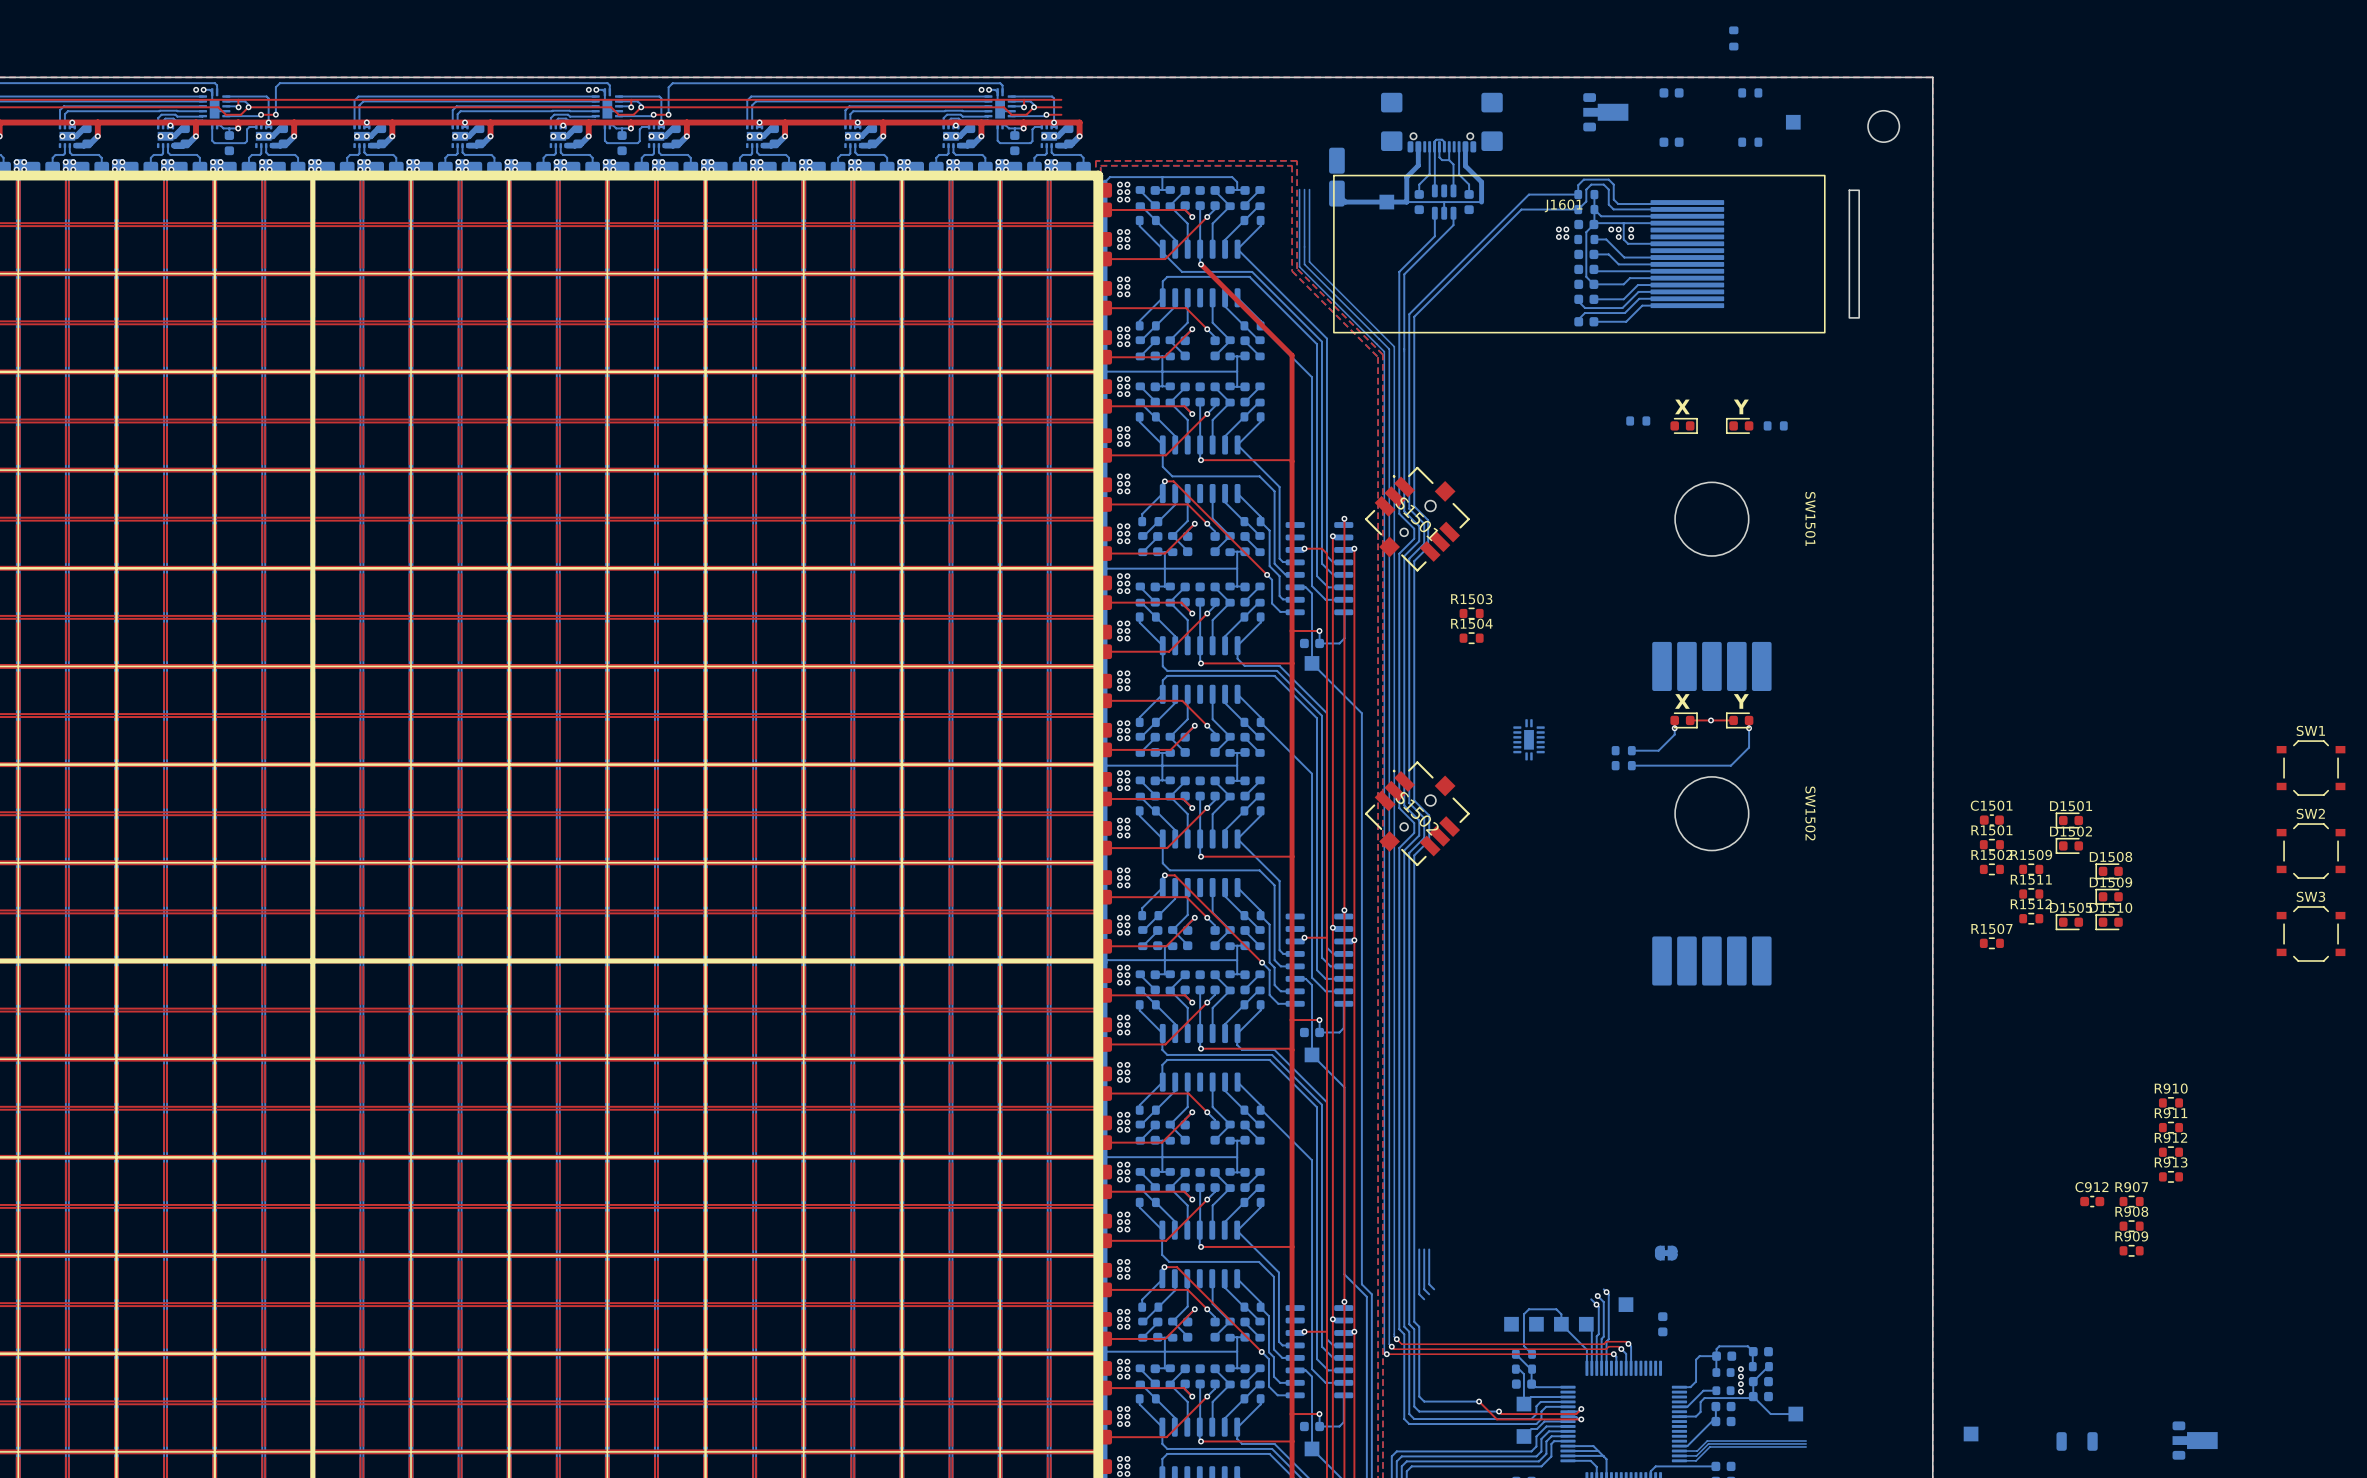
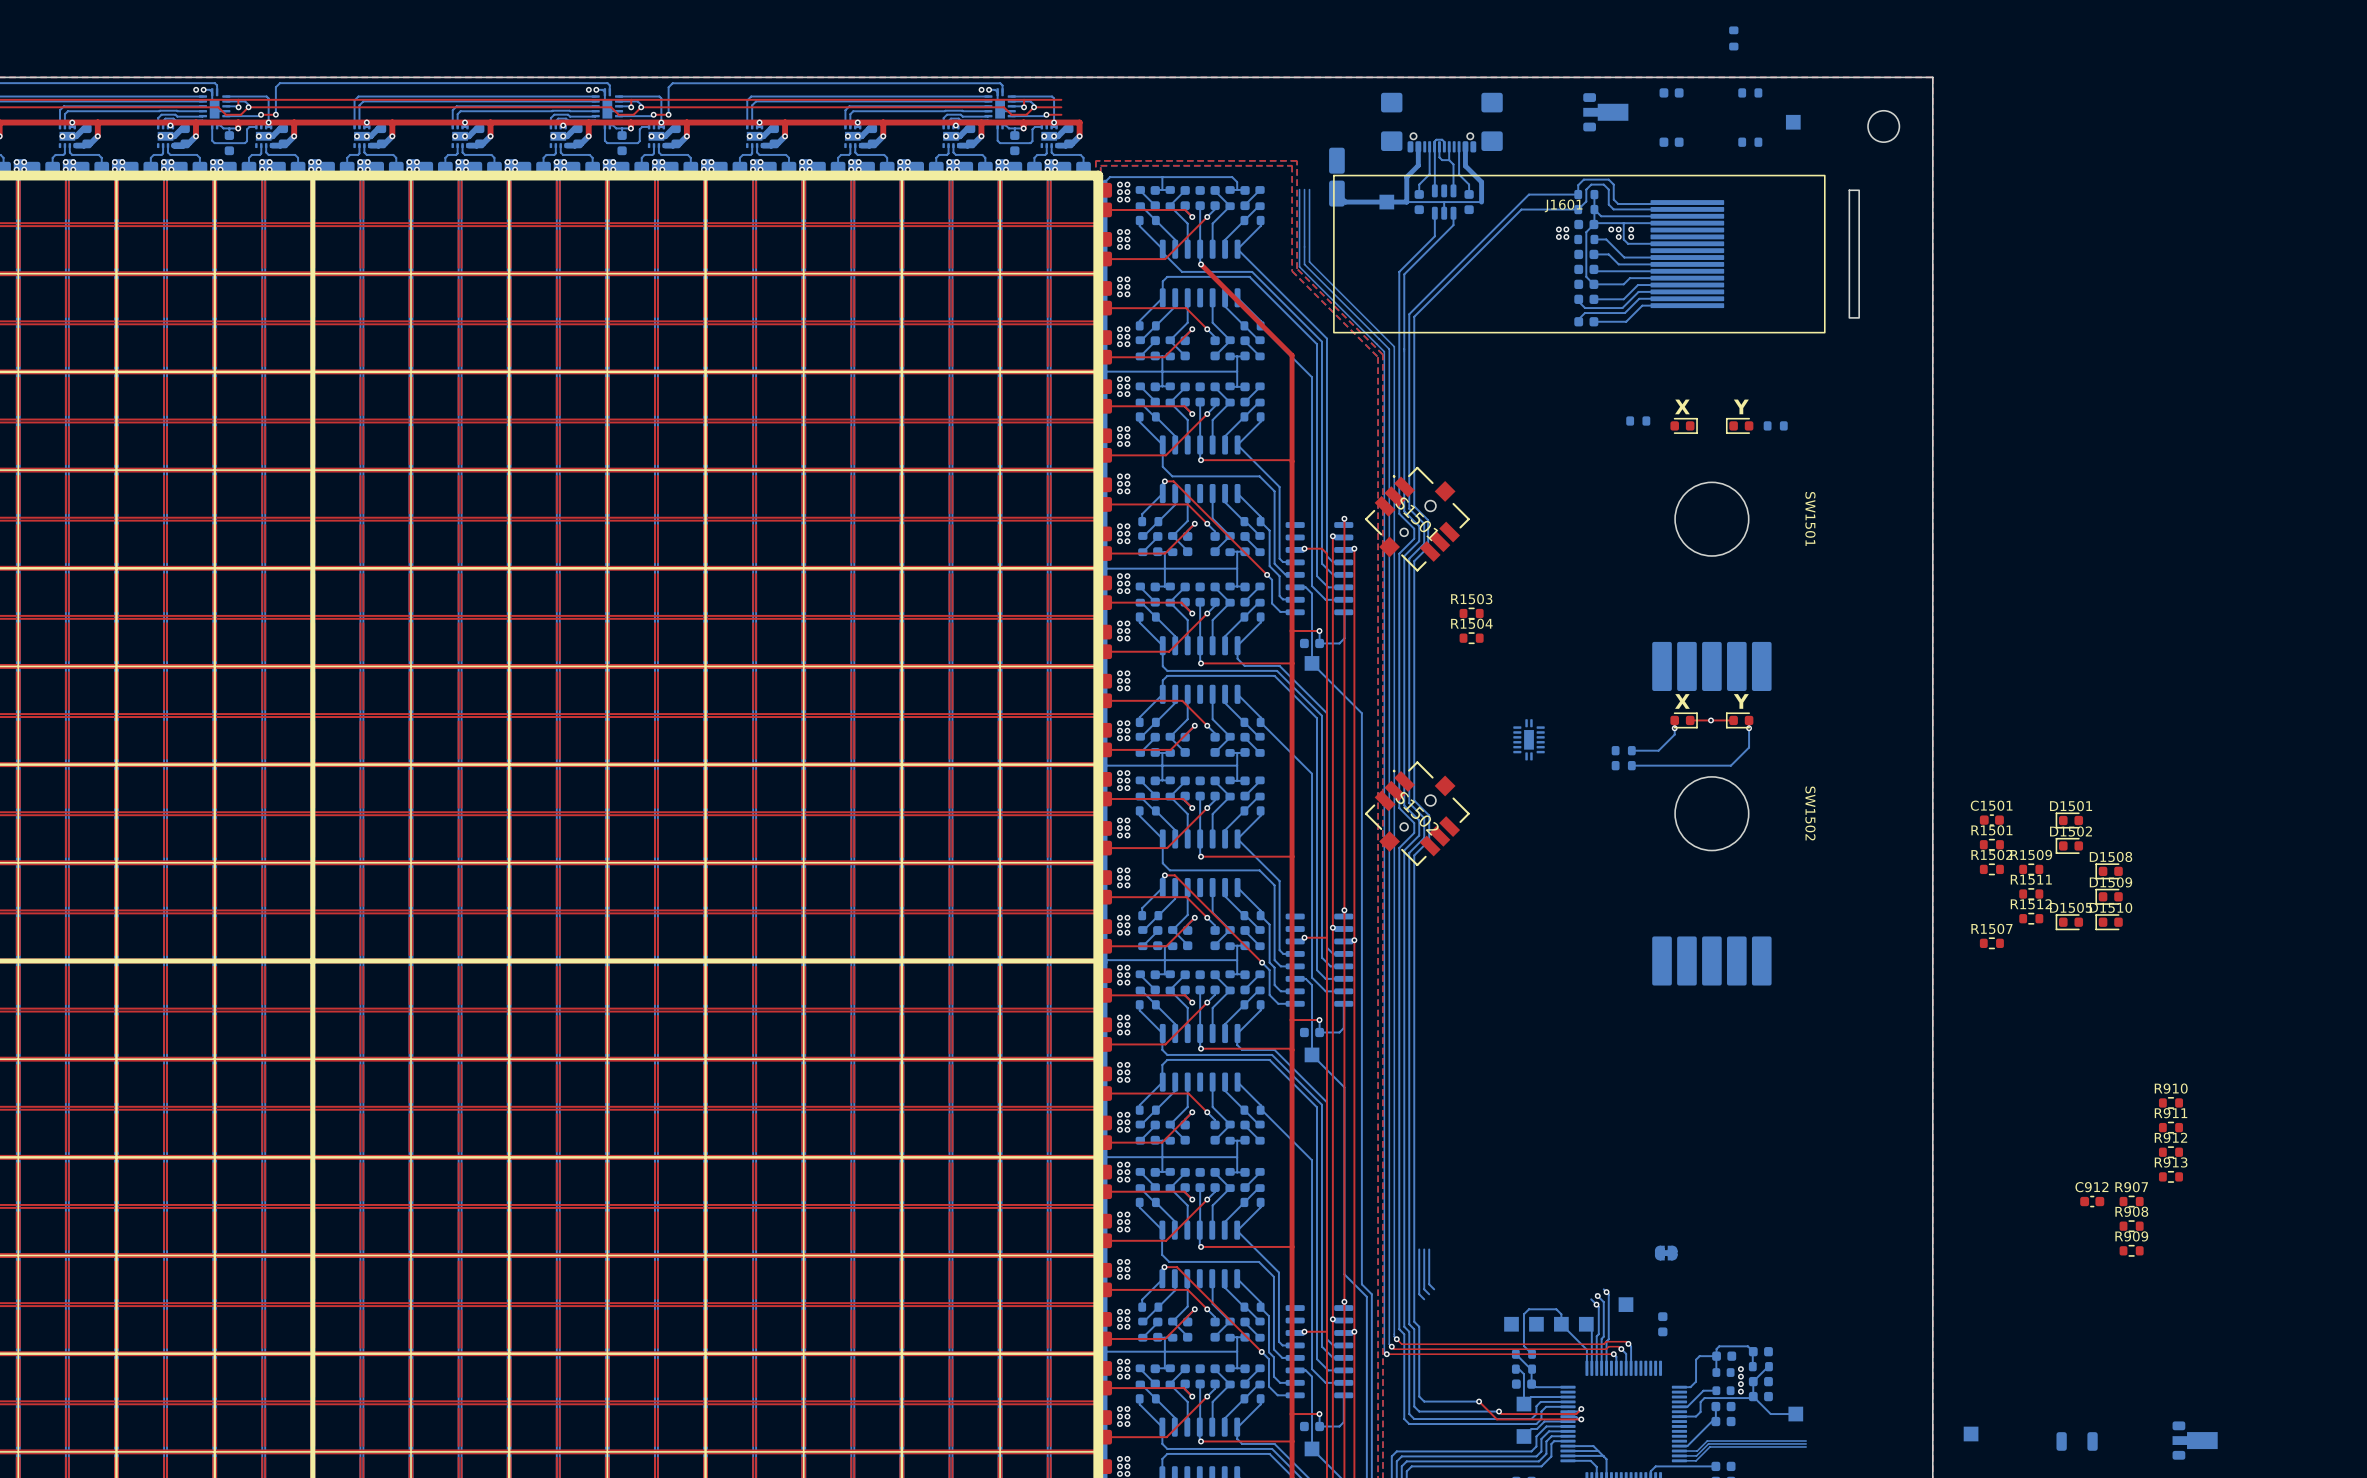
SW1: (2311, 768) -> none
SW2: (2311, 851) -> none
SW3: (2311, 933) -> none

